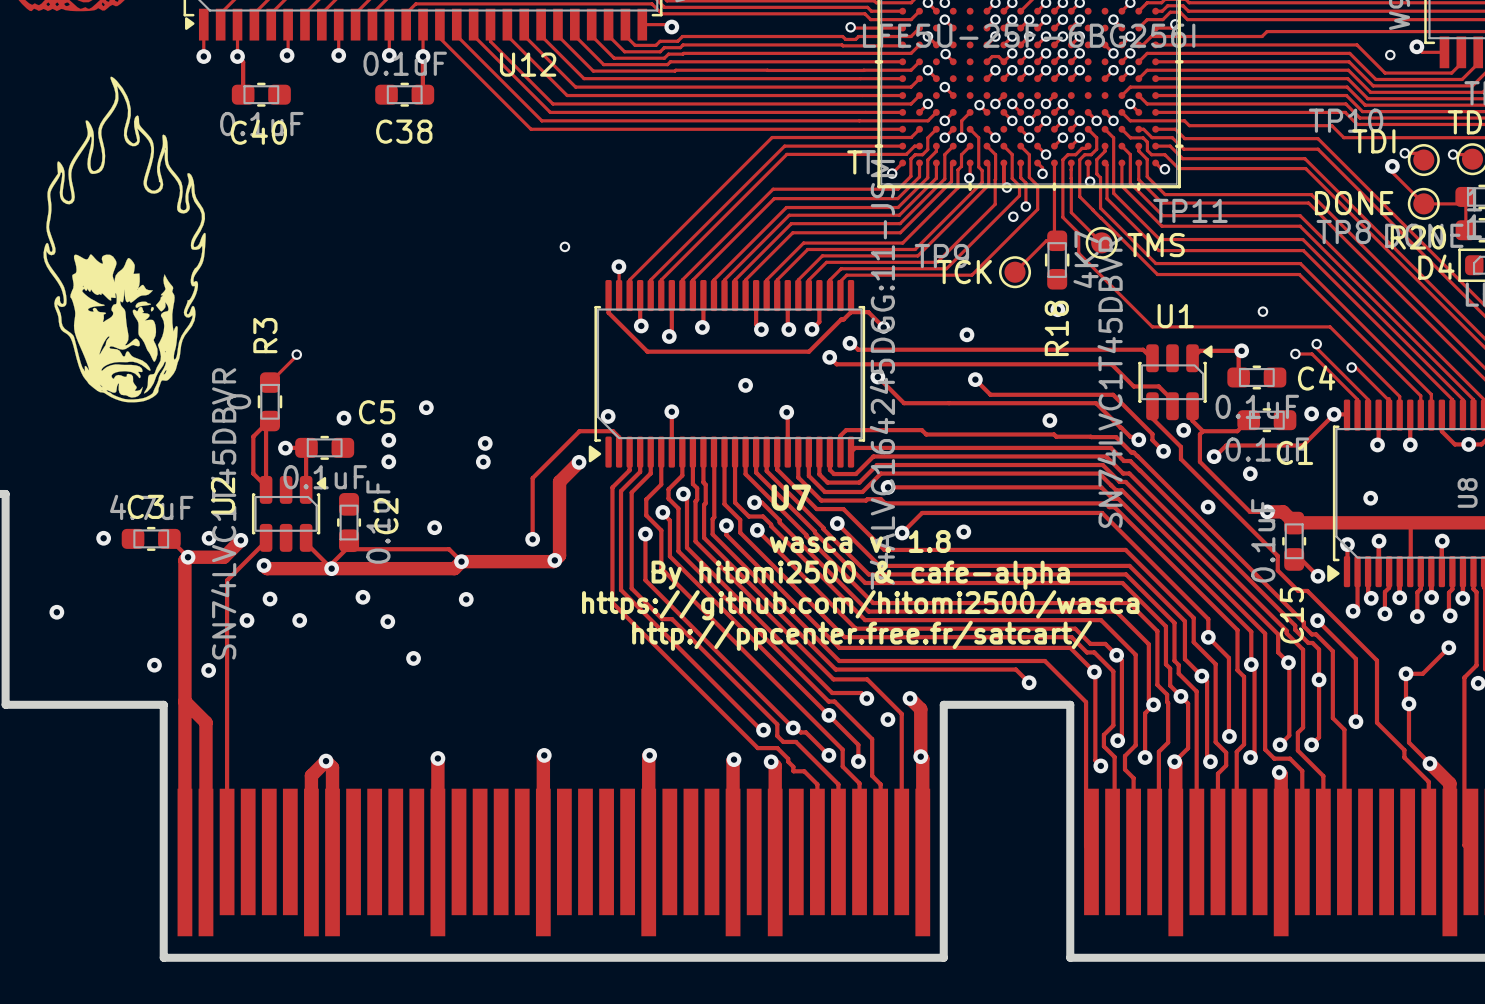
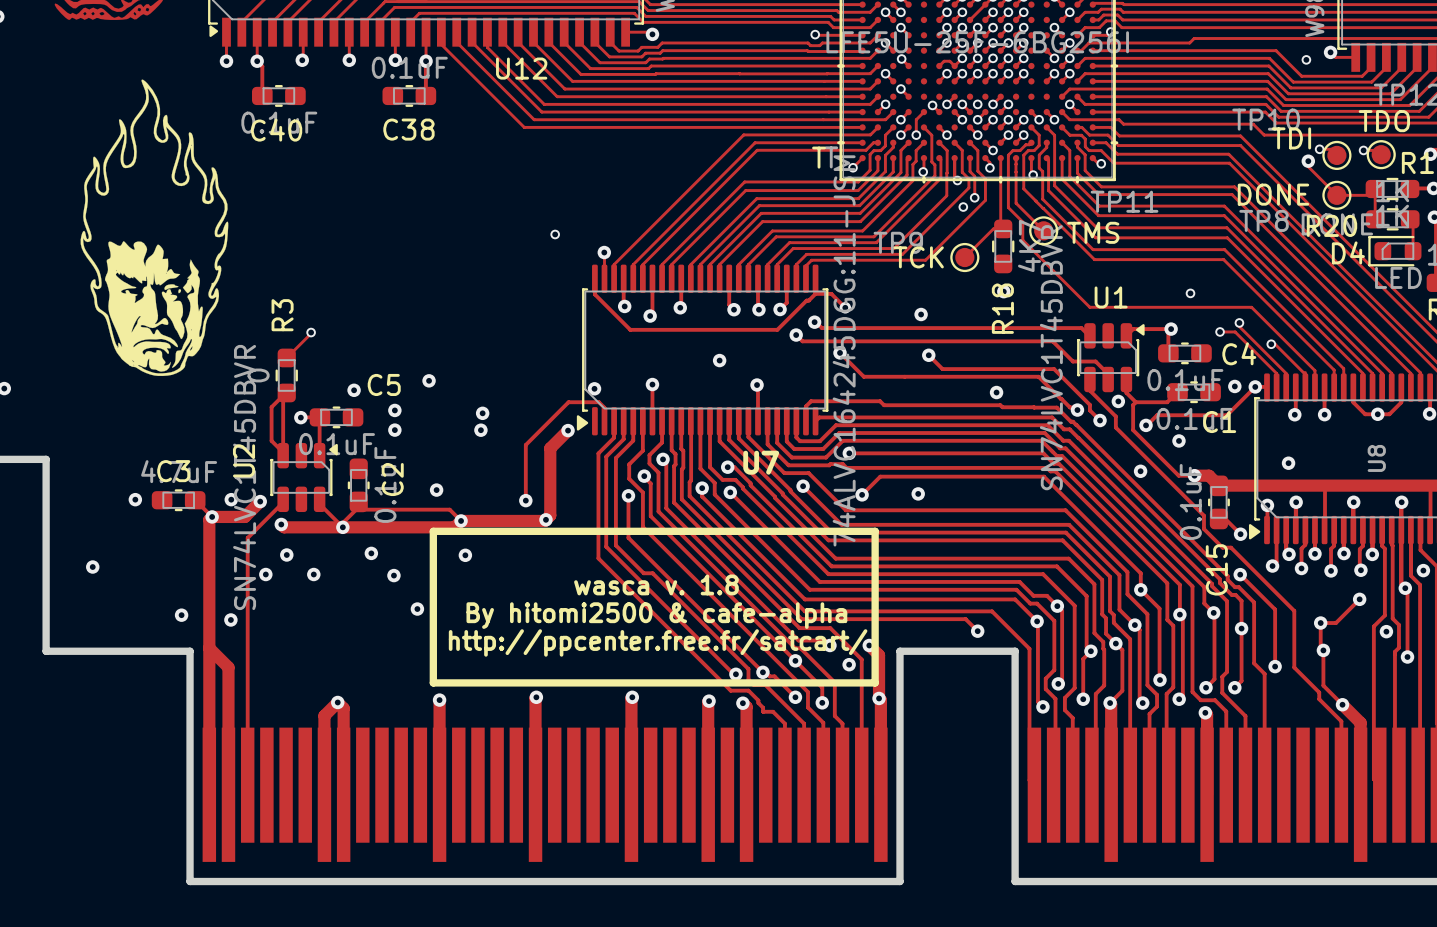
text position: wasca v. 1.8 (860, 541) -> wasca v. 1.8 (656, 584)
line: none -> (433, 531) (433, 682) (875, 682) (875, 531) (433, 531)
text position: By hitomi2500 & cafe-alpha (860, 575) -> By hitomi2500 & cafe-alpha (656, 615)
text: https://github.com/hitomi2500/wasca (860, 605) -> none
text position: http://ppcenter.free.fr/satcart/ (862, 635) -> http://ppcenter.free.fr/satcart/ (658, 642)

